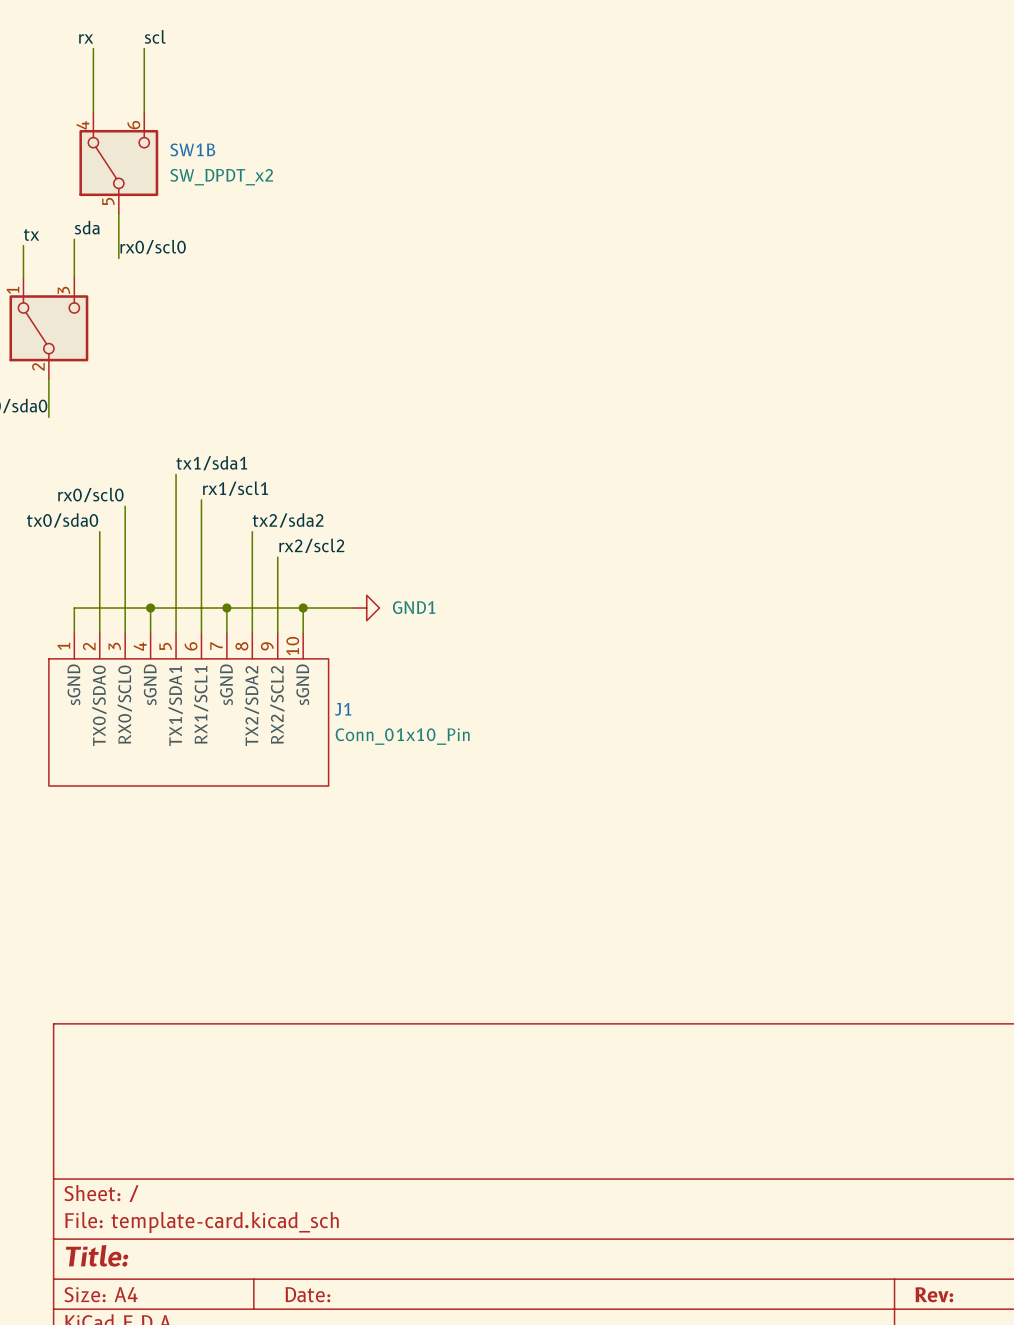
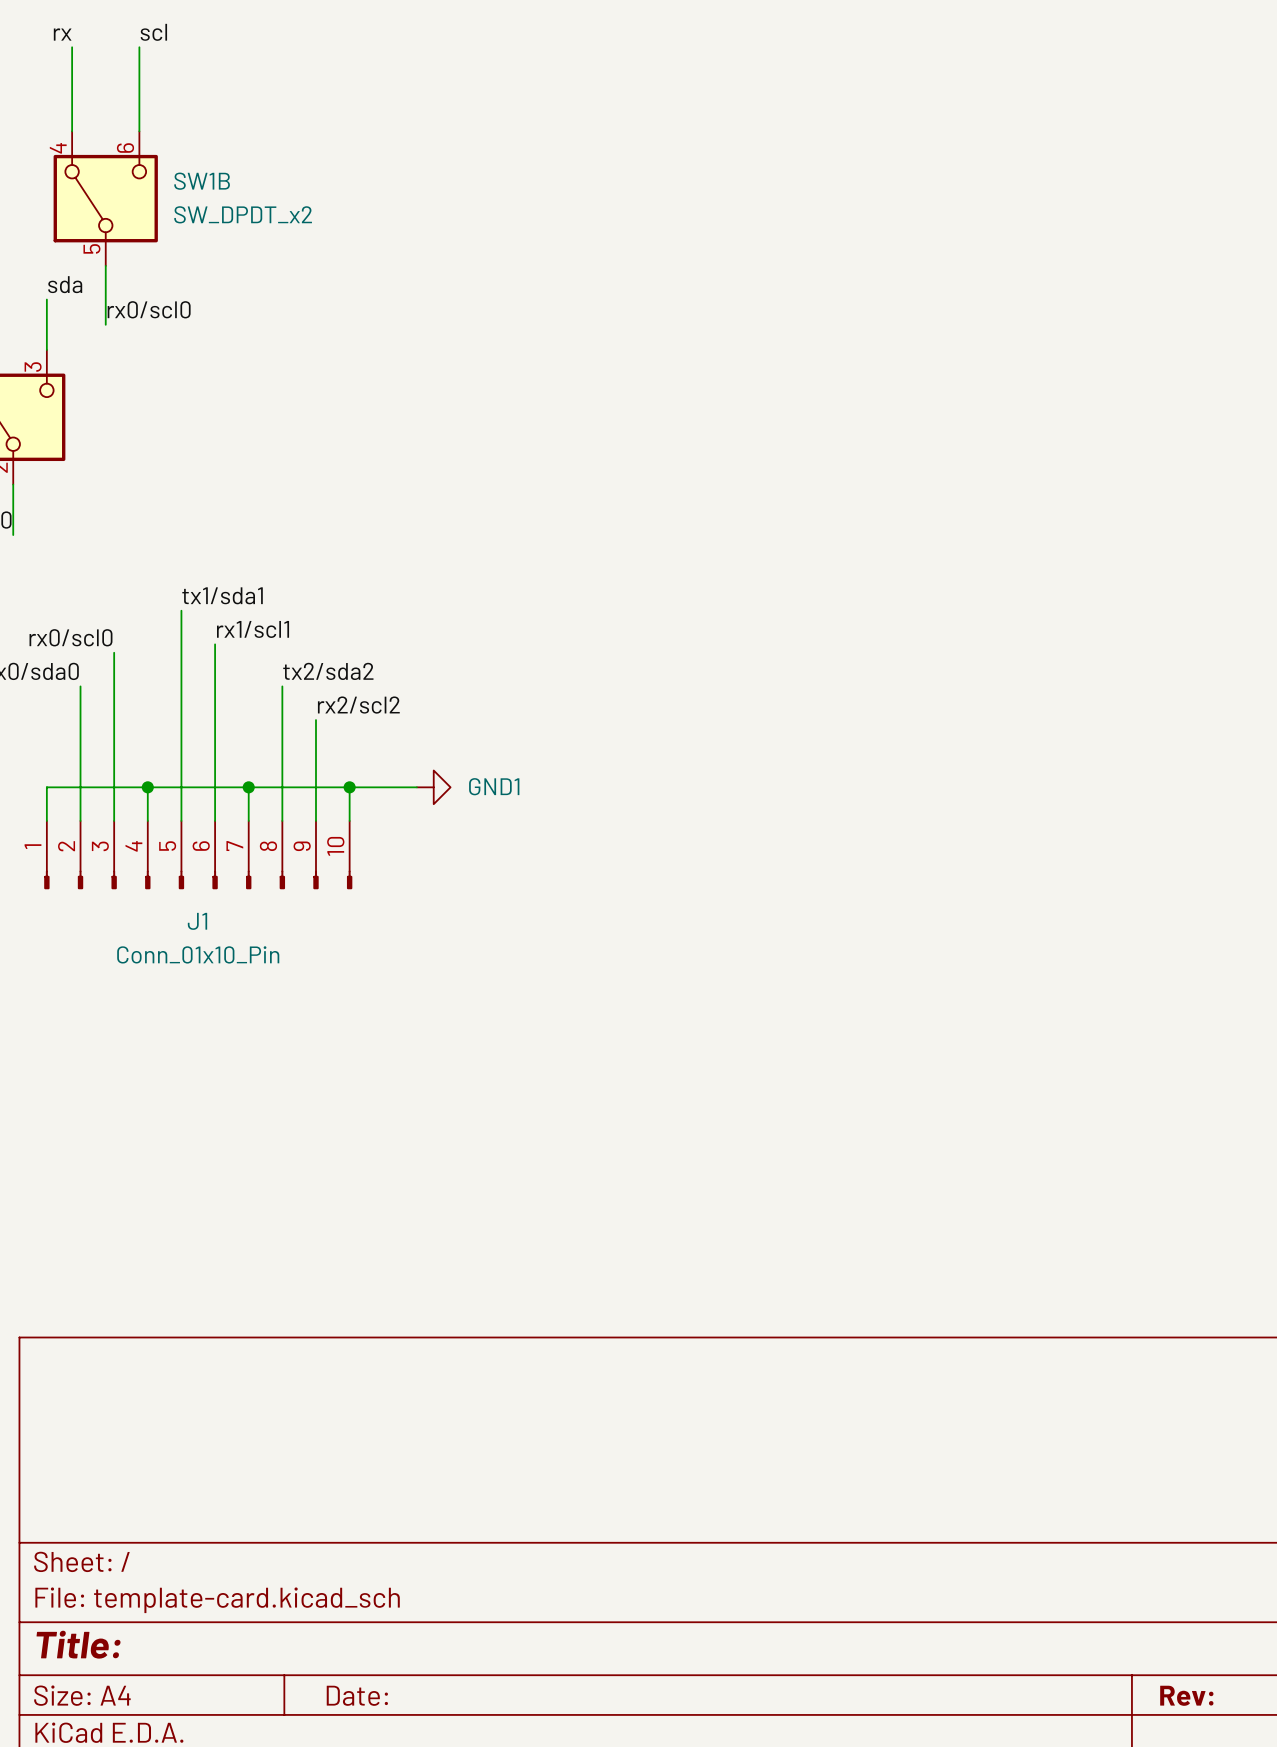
J1 symbol: [48, 633, 329, 787] -> [44, 820, 353, 890]
J1 name position: J1 (343, 709) -> J1 (197, 921)
J1 value position: Conn_01x10_Pin (402, 736) -> Conn_01x10_Pin (198, 954)

